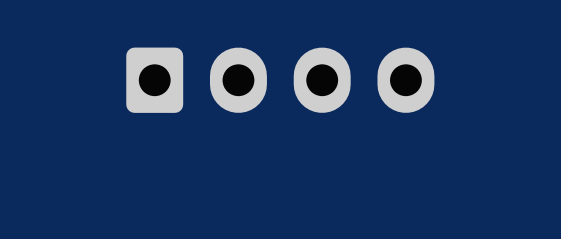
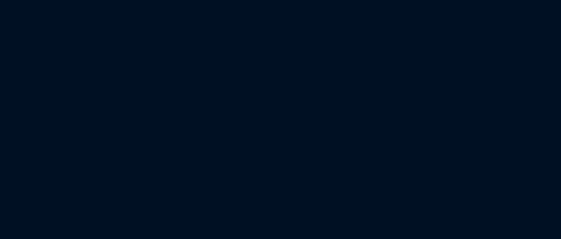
part: (280, 80) -> none

